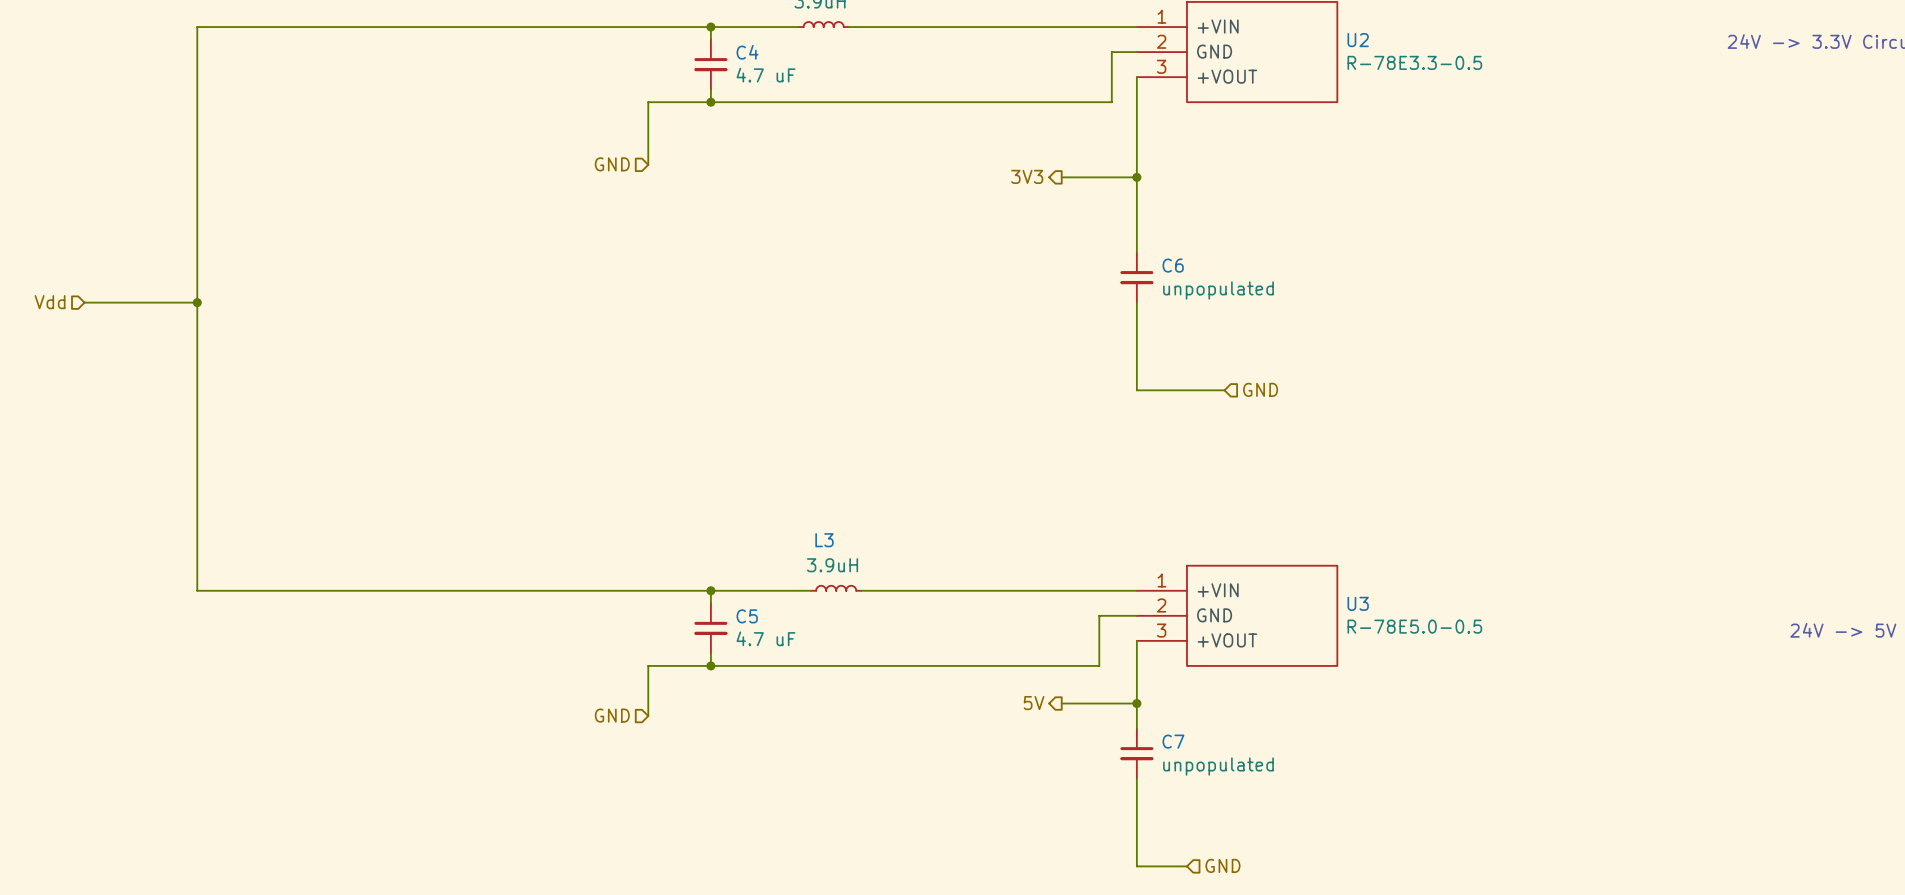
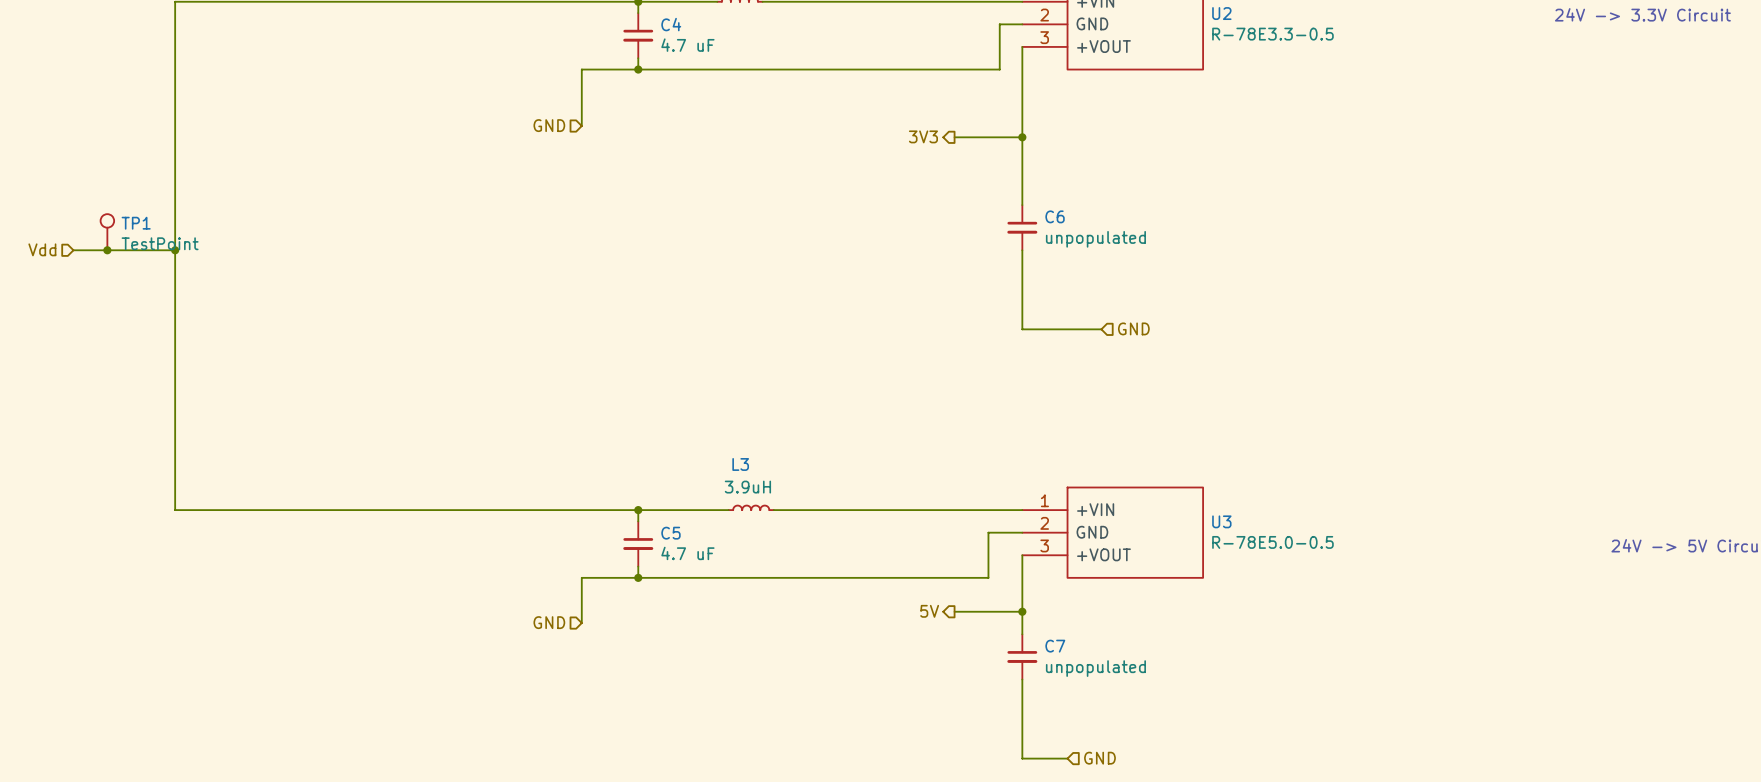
TP1: none -> TestPoint (107, 232)
junction: none -> (107, 250)

